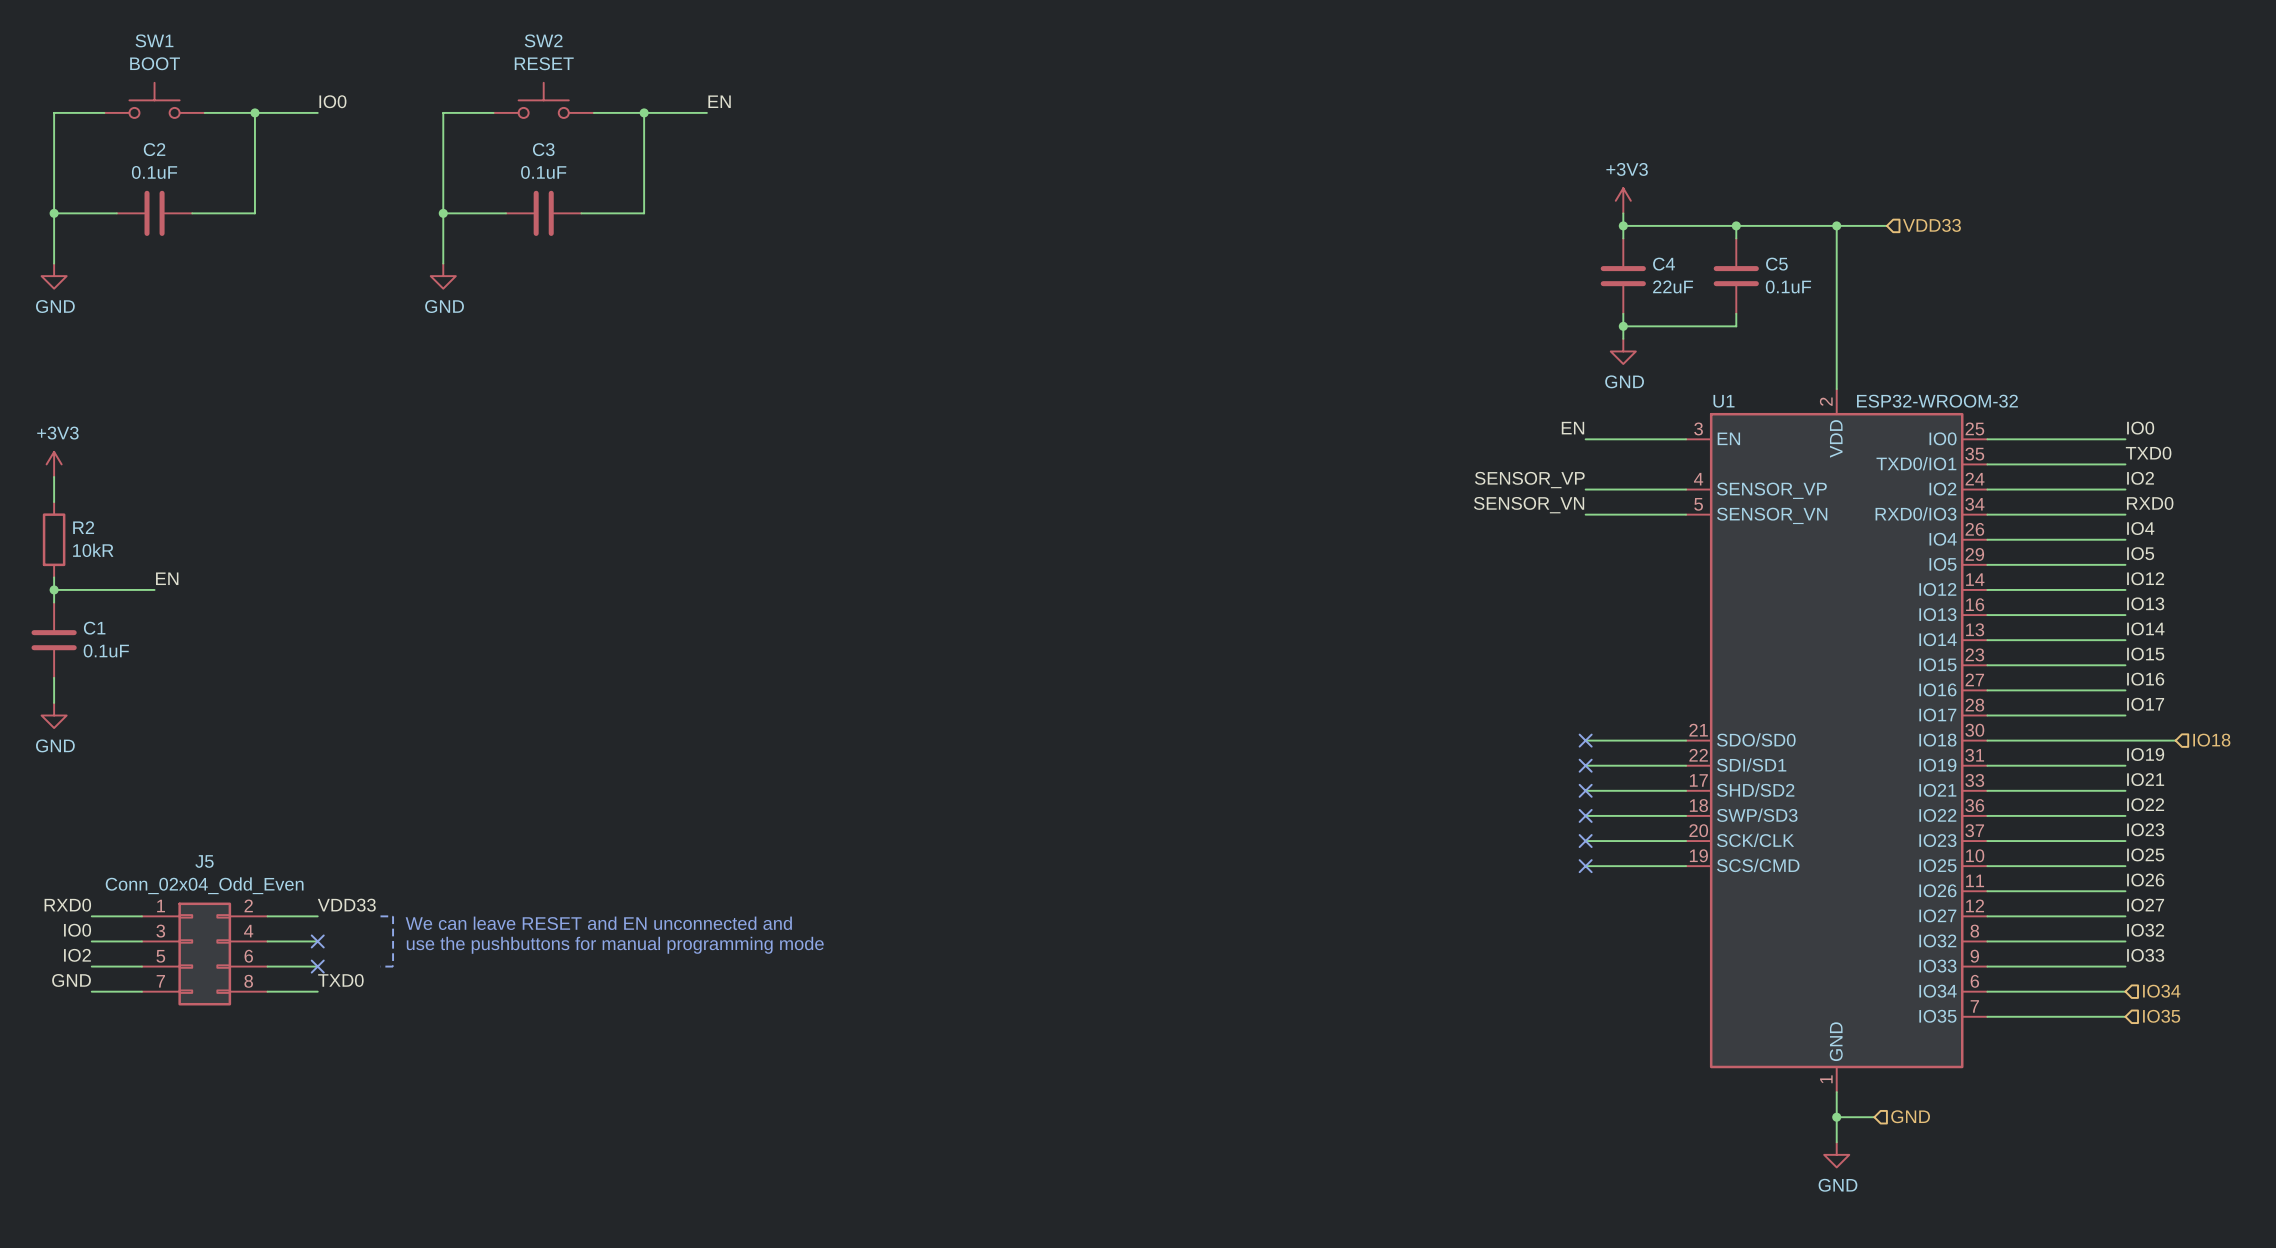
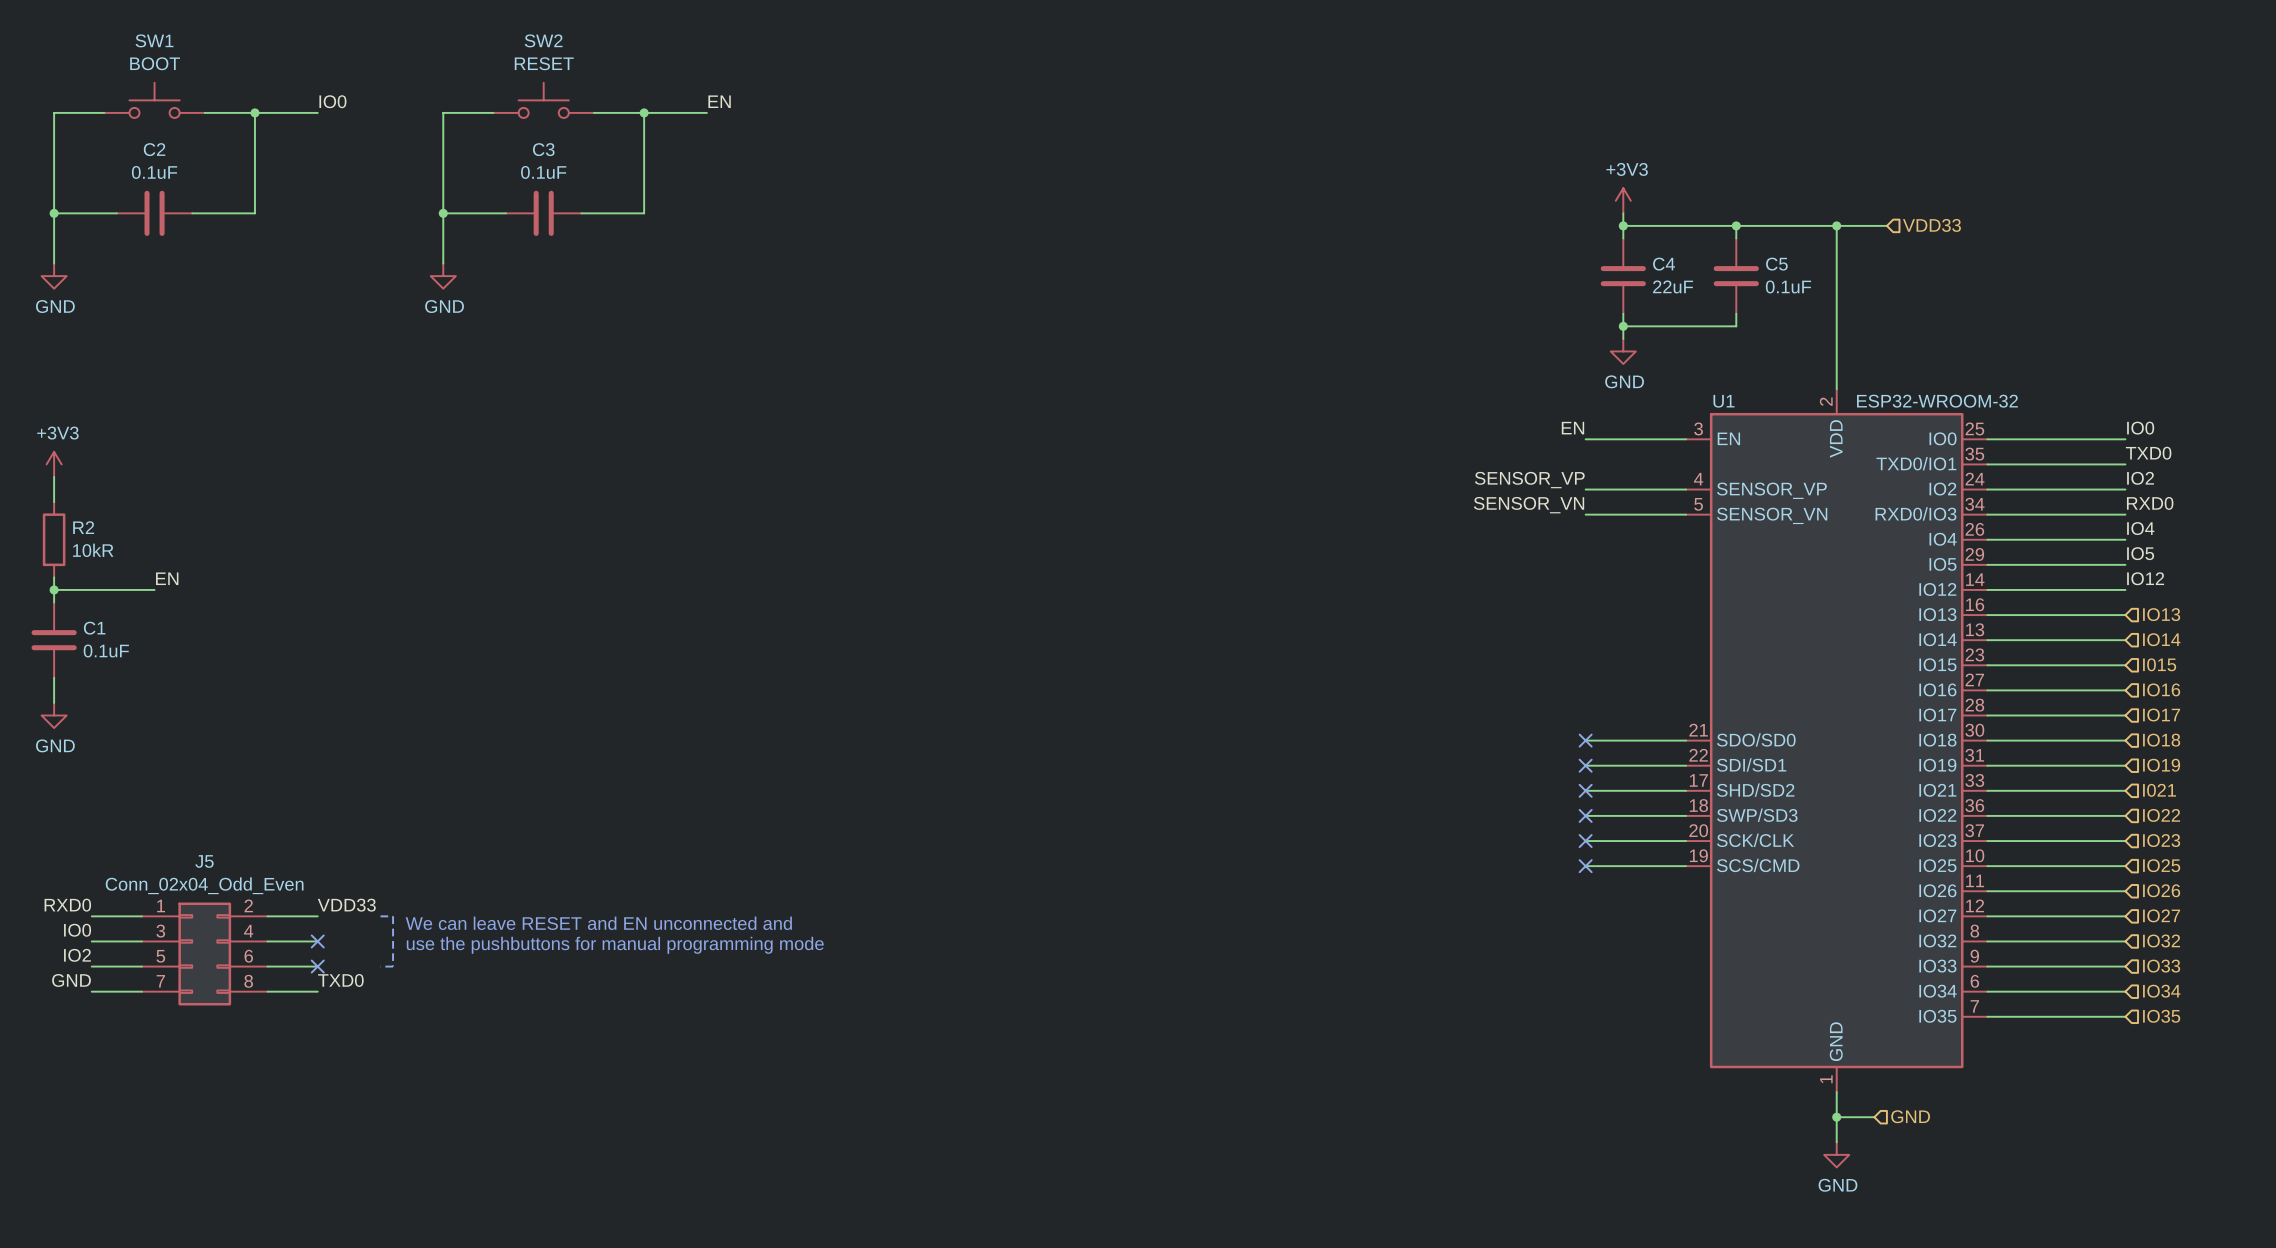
label: IO13 (2145, 603) -> none
hierarchical label: none -> IO13 (2161, 614)
label: IO14 (2145, 628) -> none
hierarchical label: none -> IO14 (2161, 639)
label: IO15 (2145, 654) -> none
hierarchical label: none -> I015 (2159, 664)
label: IO16 (2145, 679) -> none
hierarchical label: none -> IO16 (2161, 689)
label: IO17 (2145, 704) -> none
hierarchical label: none -> IO17 (2161, 715)
wire: (2125, 740) (2175, 740) -> none
hierarchical label position: IO18 (2211, 740) -> IO18 (2161, 740)
label: IO19 (2145, 754) -> none
hierarchical label: none -> IO19 (2161, 765)
label: IO21 (2145, 779) -> none
hierarchical label: none -> I021 (2159, 790)
label: IO22 (2145, 804) -> none
hierarchical label: none -> IO22 (2161, 815)
label: IO23 (2145, 829) -> none
hierarchical label: none -> IO23 (2161, 840)
label: IO25 (2145, 854) -> none
hierarchical label: none -> IO25 (2161, 865)
label: IO26 (2145, 880) -> none
hierarchical label: none -> IO26 (2161, 890)
label: IO27 (2145, 905) -> none
hierarchical label: none -> IO27 (2161, 915)
label: IO32 (2145, 930) -> none
hierarchical label: none -> IO32 (2161, 940)
label: IO33 (2145, 955) -> none
hierarchical label: none -> IO33 (2161, 966)

